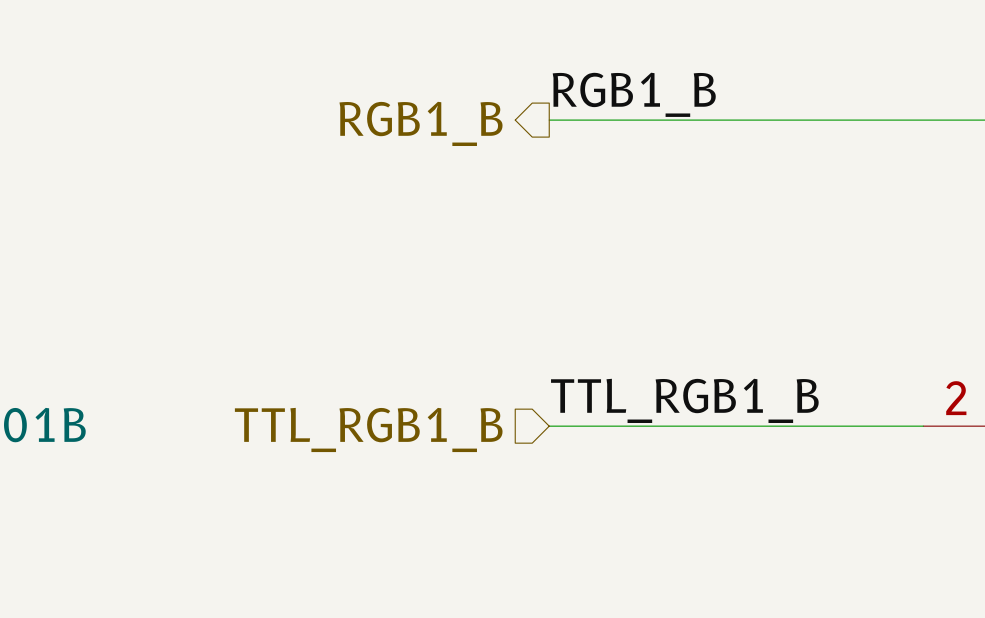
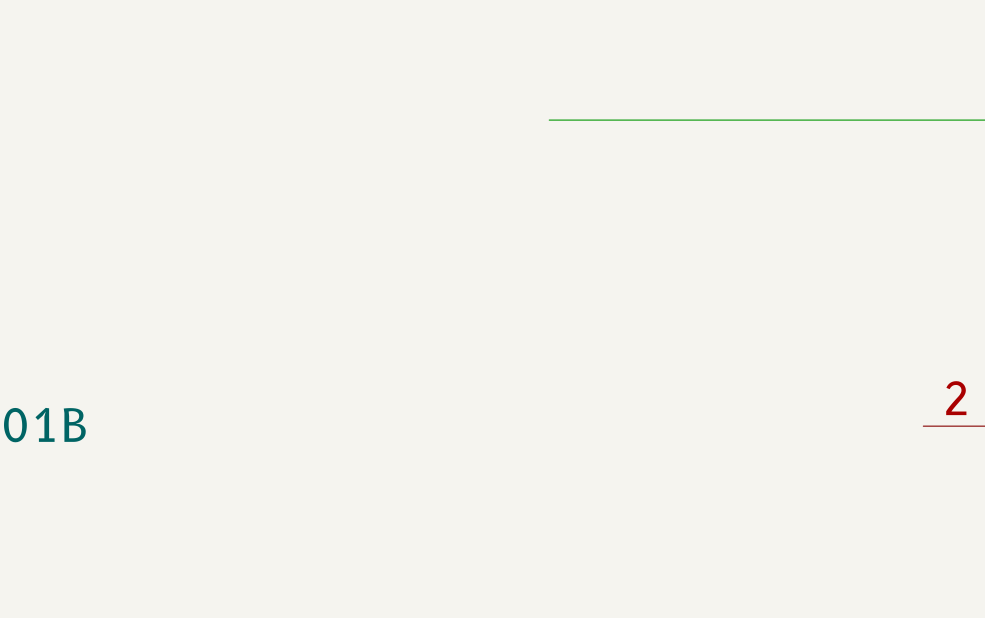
label: RGB1_B (634, 94) -> none
hierarchical label: RGB1_B (421, 123) -> none
label: TTL_RGB1_B (684, 400) -> none
wire: (549, 426) (923, 426) -> none
hierarchical label: TTL_RGB1_B (368, 429) -> none

